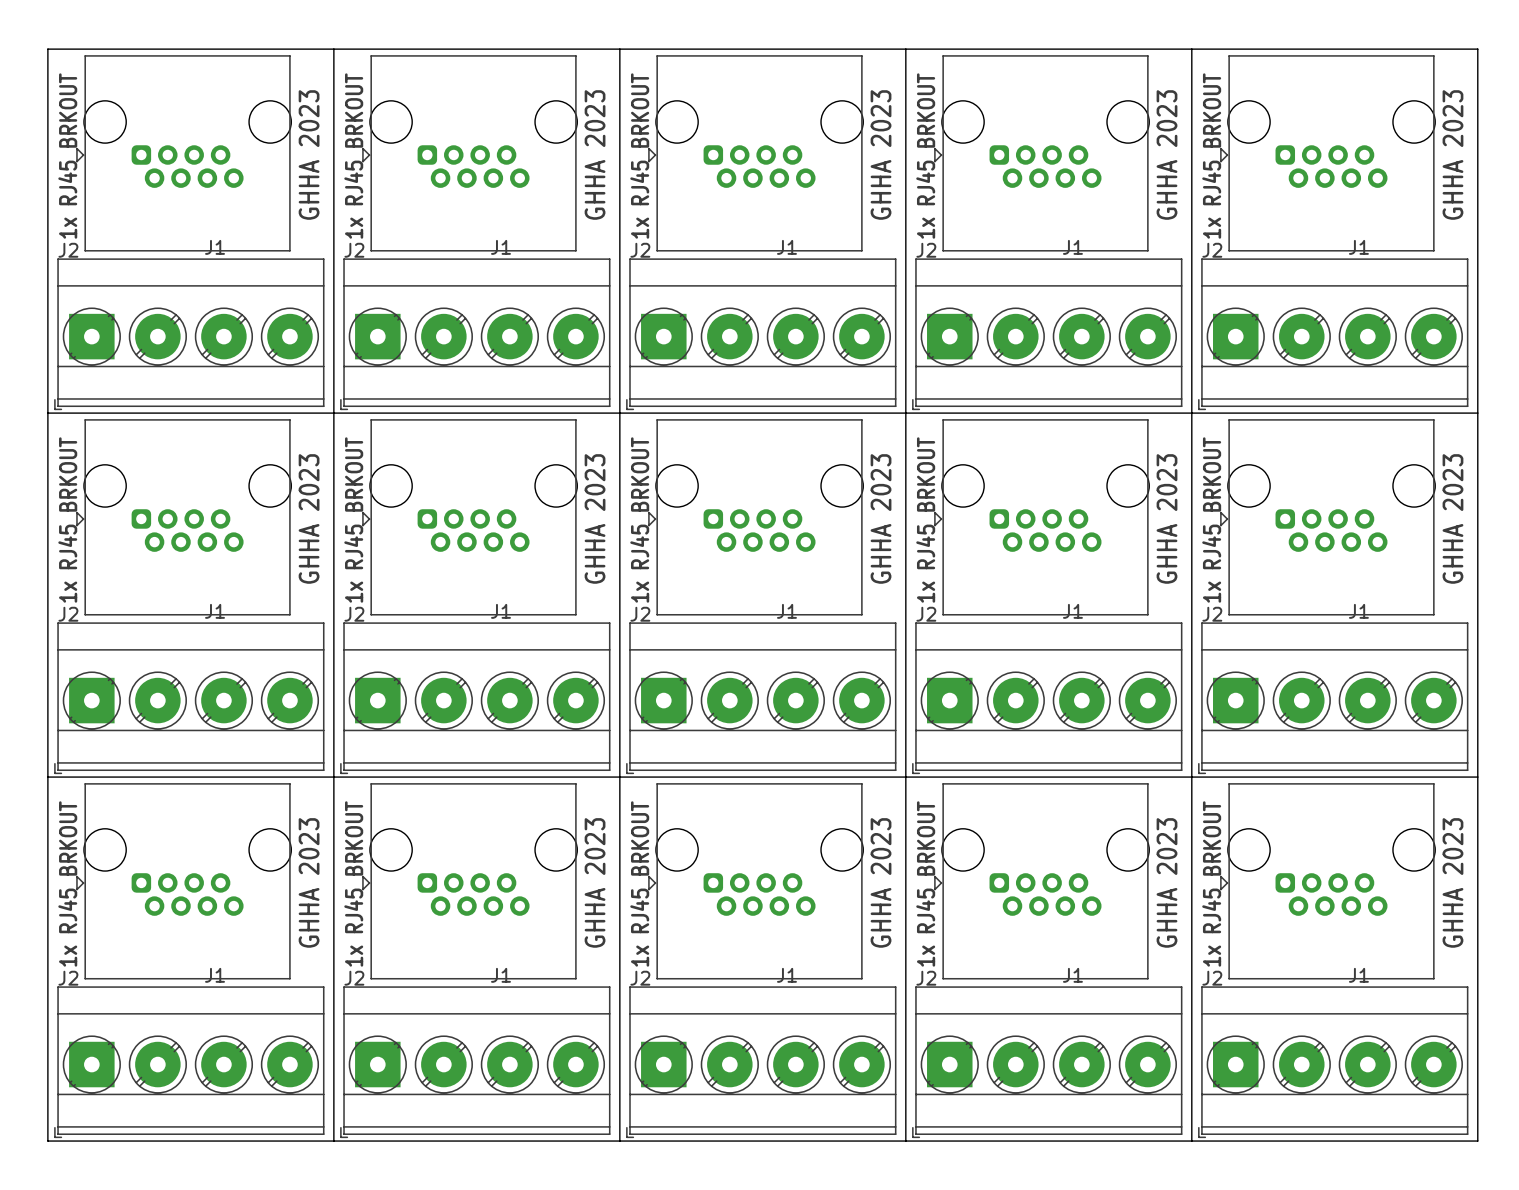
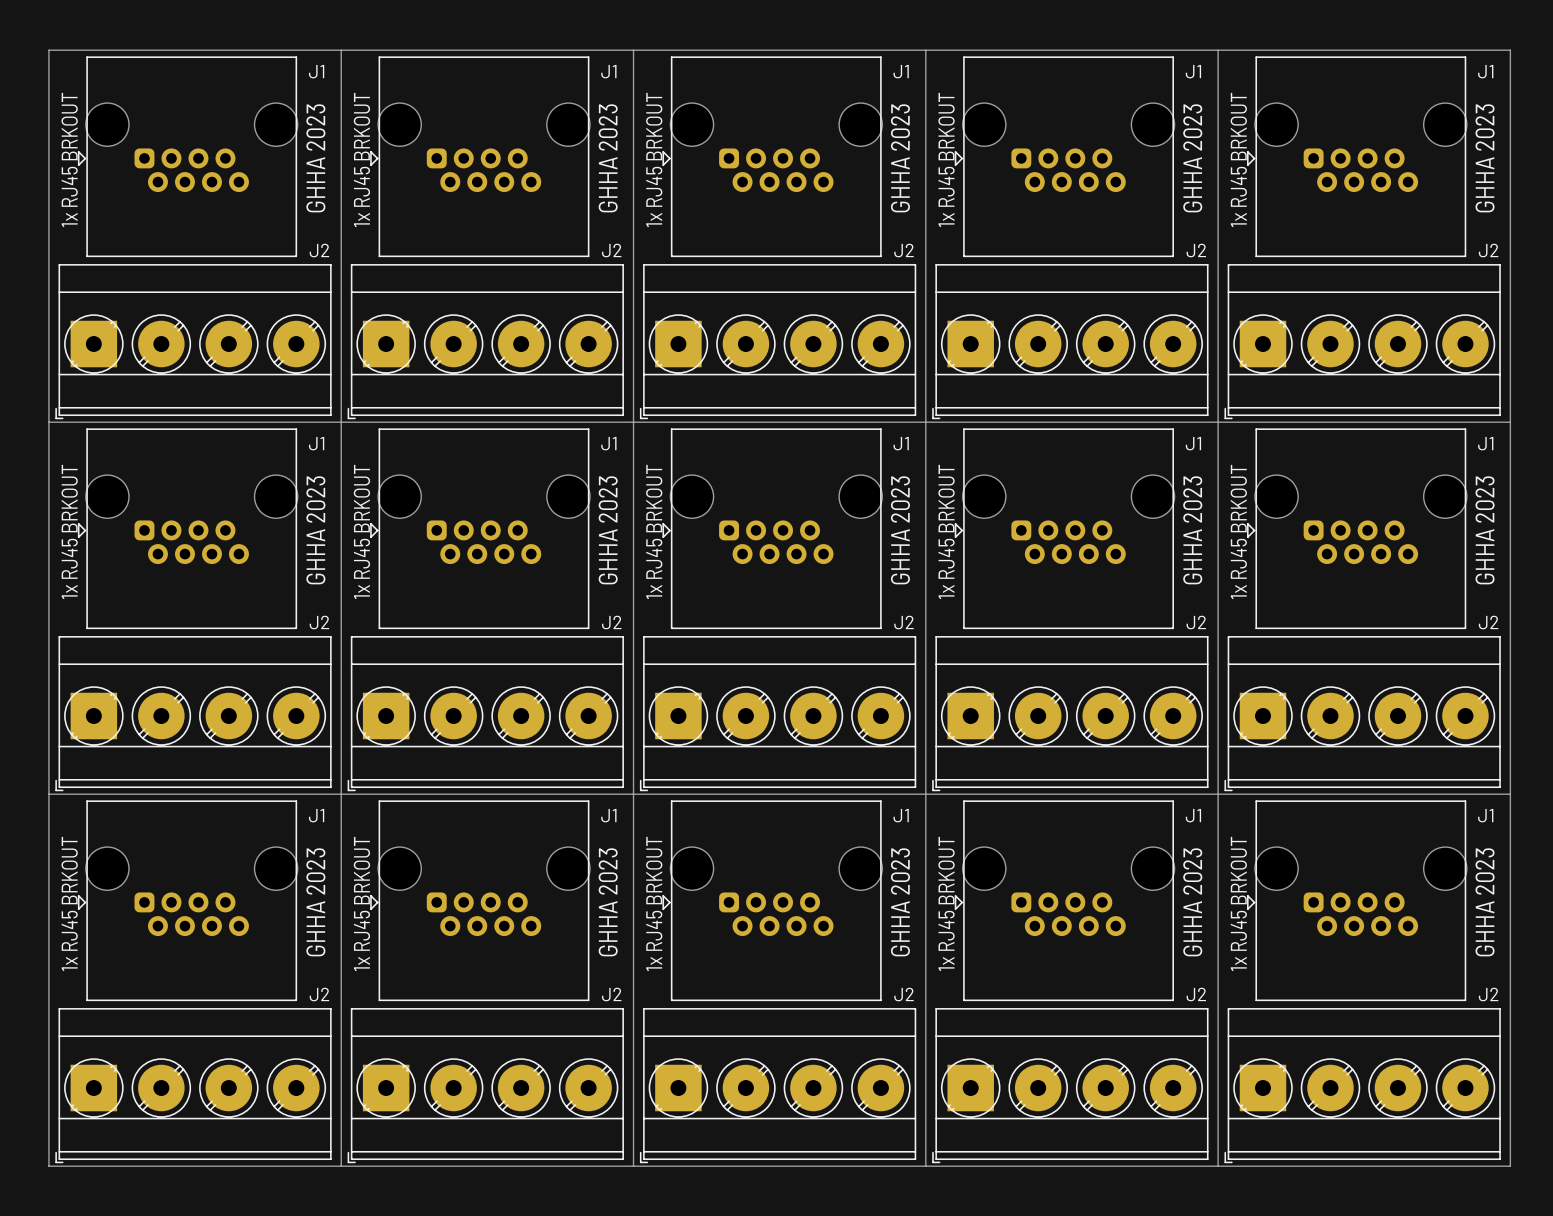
J1 name position: J1 (215, 247) -> J1 (316, 71)
J1 name position: J1 (500, 247) -> J1 (608, 71)
J1 name position: J1 (786, 247) -> J1 (901, 71)
J1 name position: J1 (1072, 247) -> J1 (1193, 71)
J1 name position: J1 (1358, 247) -> J1 (1485, 71)
J2 name position: J2 (68, 250) -> J2 (319, 250)
J2 name position: J2 (354, 250) -> J2 (611, 250)
J2 name position: J2 (640, 250) -> J2 (904, 250)
J2 name position: J2 (926, 250) -> J2 (1196, 250)
J2 name position: J2 (1212, 250) -> J2 (1488, 250)
J1 name position: J1 (215, 611) -> J1 (316, 443)
J1 name position: J1 (500, 611) -> J1 (608, 443)
J1 name position: J1 (786, 611) -> J1 (901, 443)
J1 name position: J1 (1072, 611) -> J1 (1193, 443)
J1 name position: J1 (1358, 611) -> J1 (1485, 443)
J2 name position: J2 (68, 614) -> J2 (319, 622)
J2 name position: J2 (354, 614) -> J2 (611, 622)
J2 name position: J2 (640, 614) -> J2 (904, 622)
J2 name position: J2 (926, 614) -> J2 (1196, 622)
J2 name position: J2 (1212, 614) -> J2 (1488, 622)
J1 name position: J1 (215, 975) -> J1 (316, 815)
J1 name position: J1 (500, 975) -> J1 (608, 815)
J1 name position: J1 (786, 975) -> J1 (901, 815)
J1 name position: J1 (1072, 975) -> J1 (1193, 815)
J1 name position: J1 (1358, 975) -> J1 (1485, 815)
J2 name position: J2 (68, 978) -> J2 (319, 994)
J2 name position: J2 (354, 978) -> J2 (611, 994)
J2 name position: J2 (640, 978) -> J2 (904, 994)
J2 name position: J2 (926, 978) -> J2 (1196, 994)
J2 name position: J2 (1212, 978) -> J2 (1488, 994)

